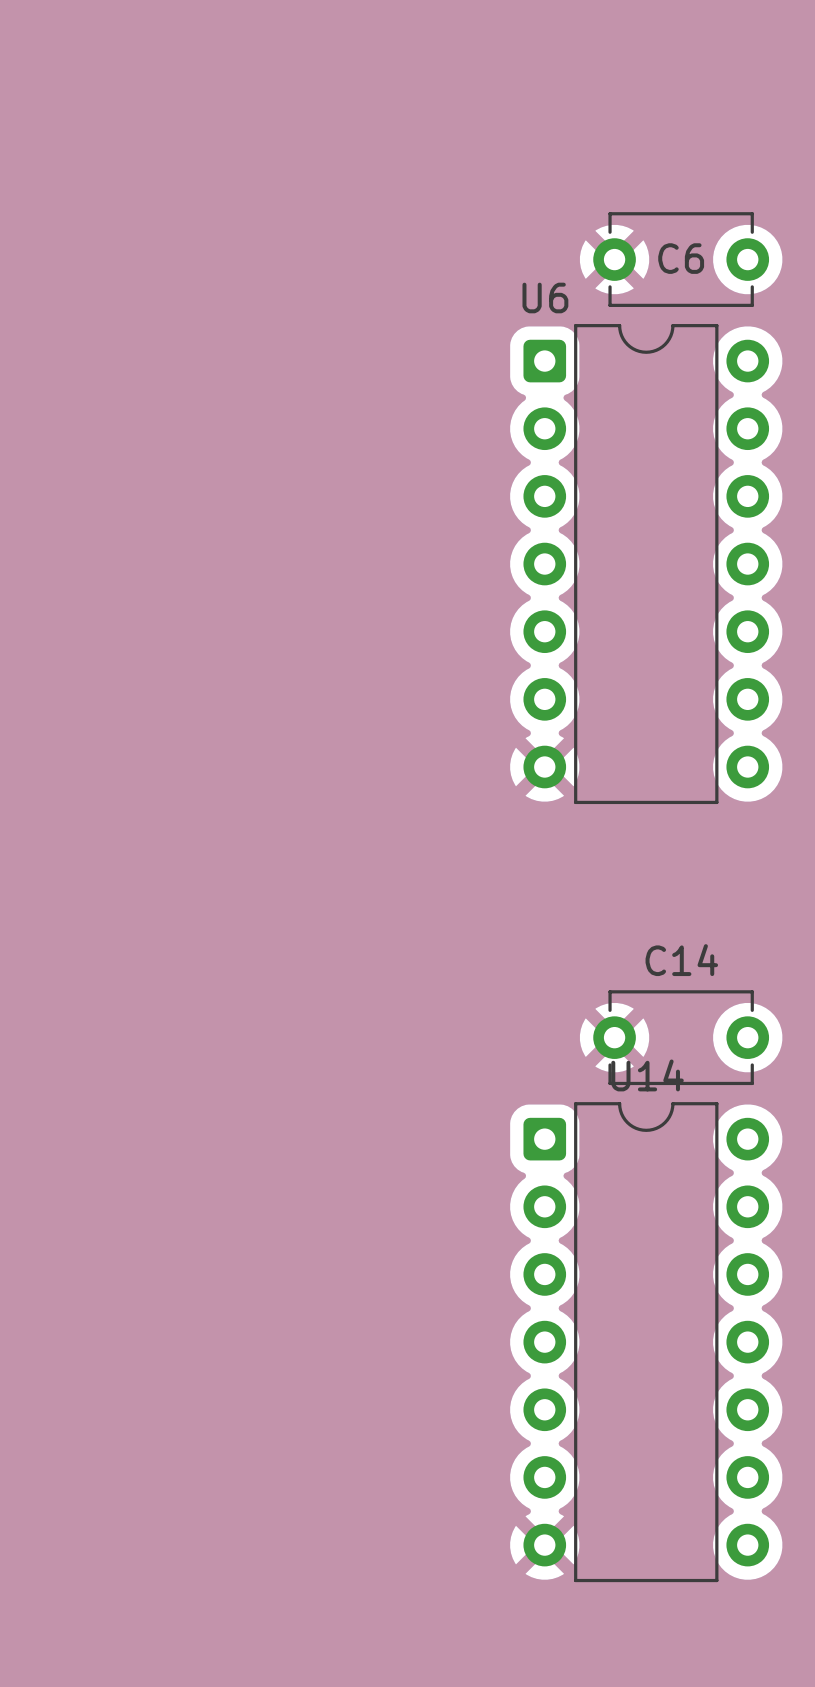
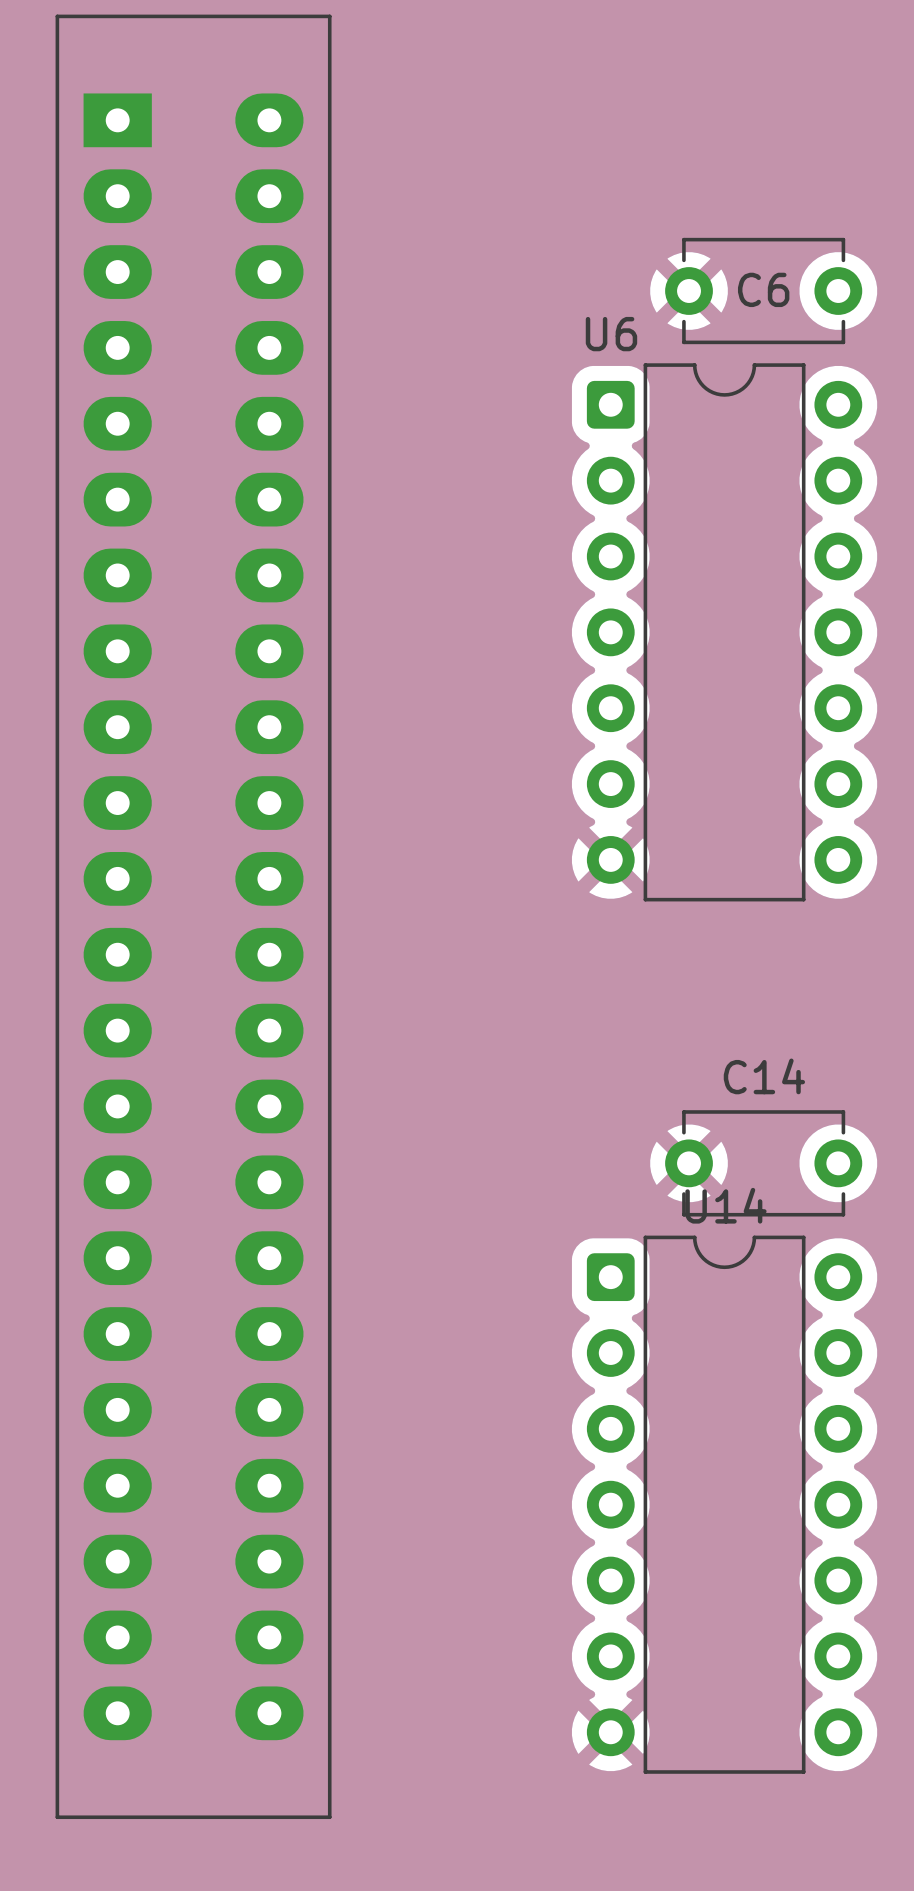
part: none -> (193, 916)

